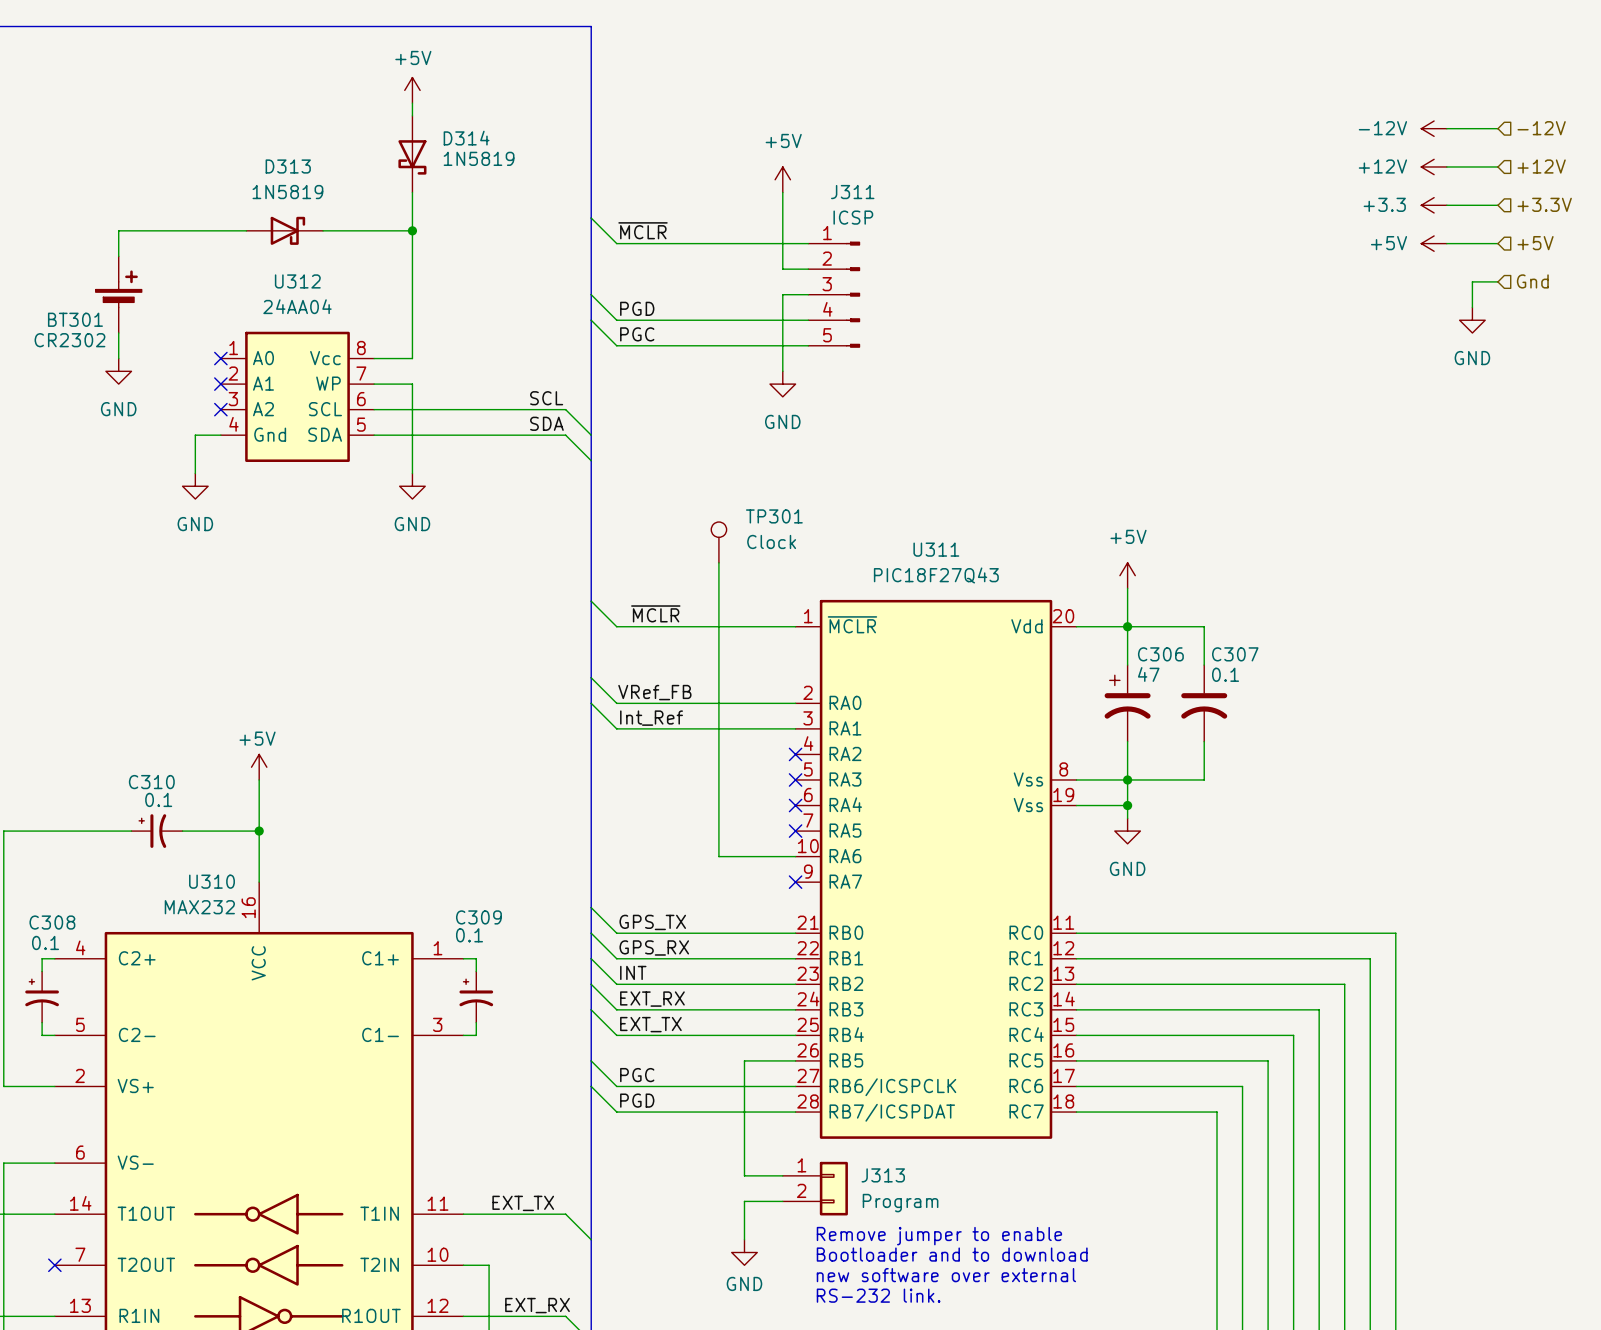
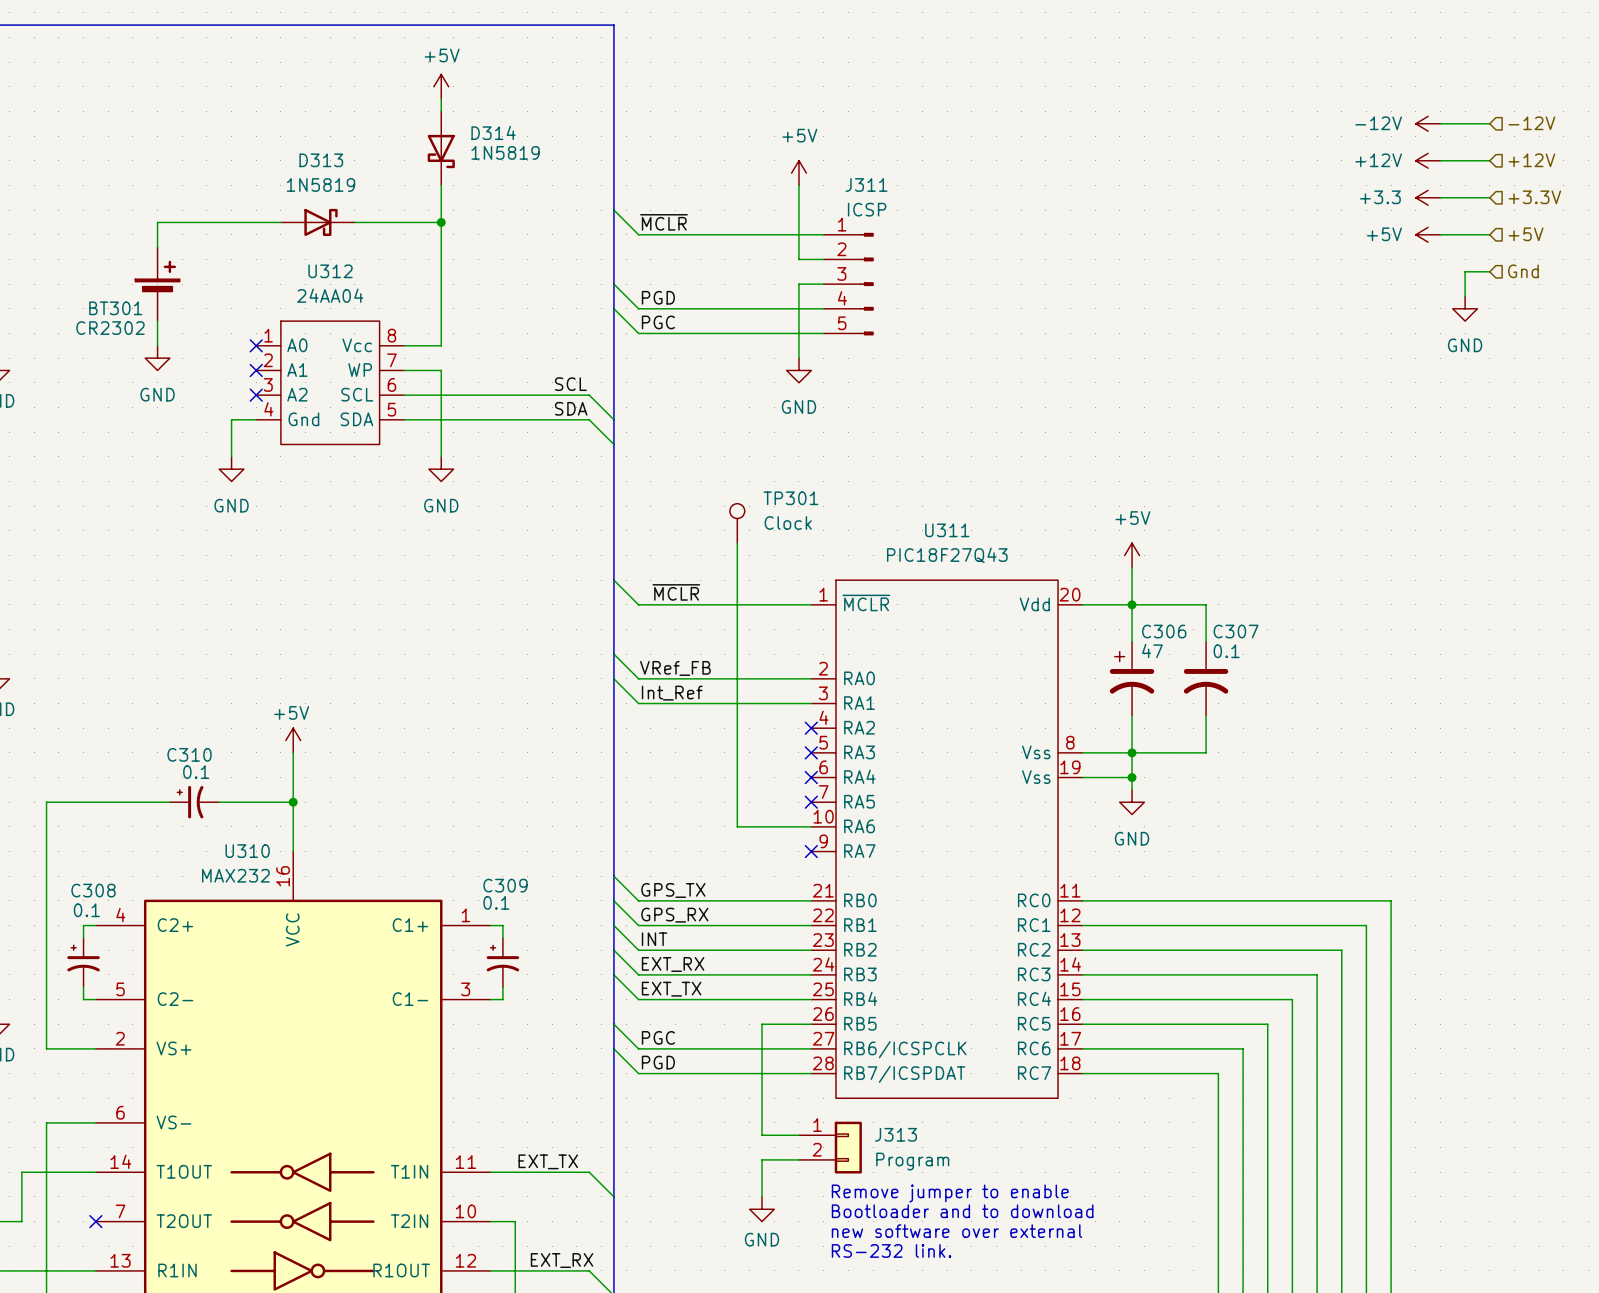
U312 symbol: [220, 331, 375, 462] -> [256, 321, 405, 445]
U311 symbol: [795, 599, 1077, 1139] -> [811, 580, 1083, 1099]

